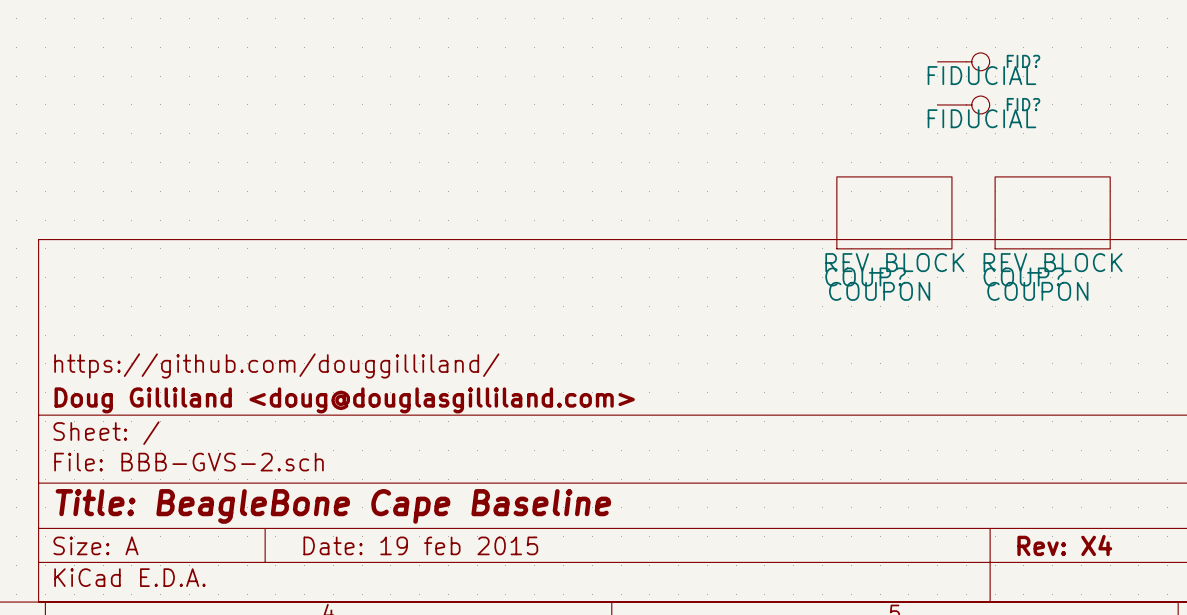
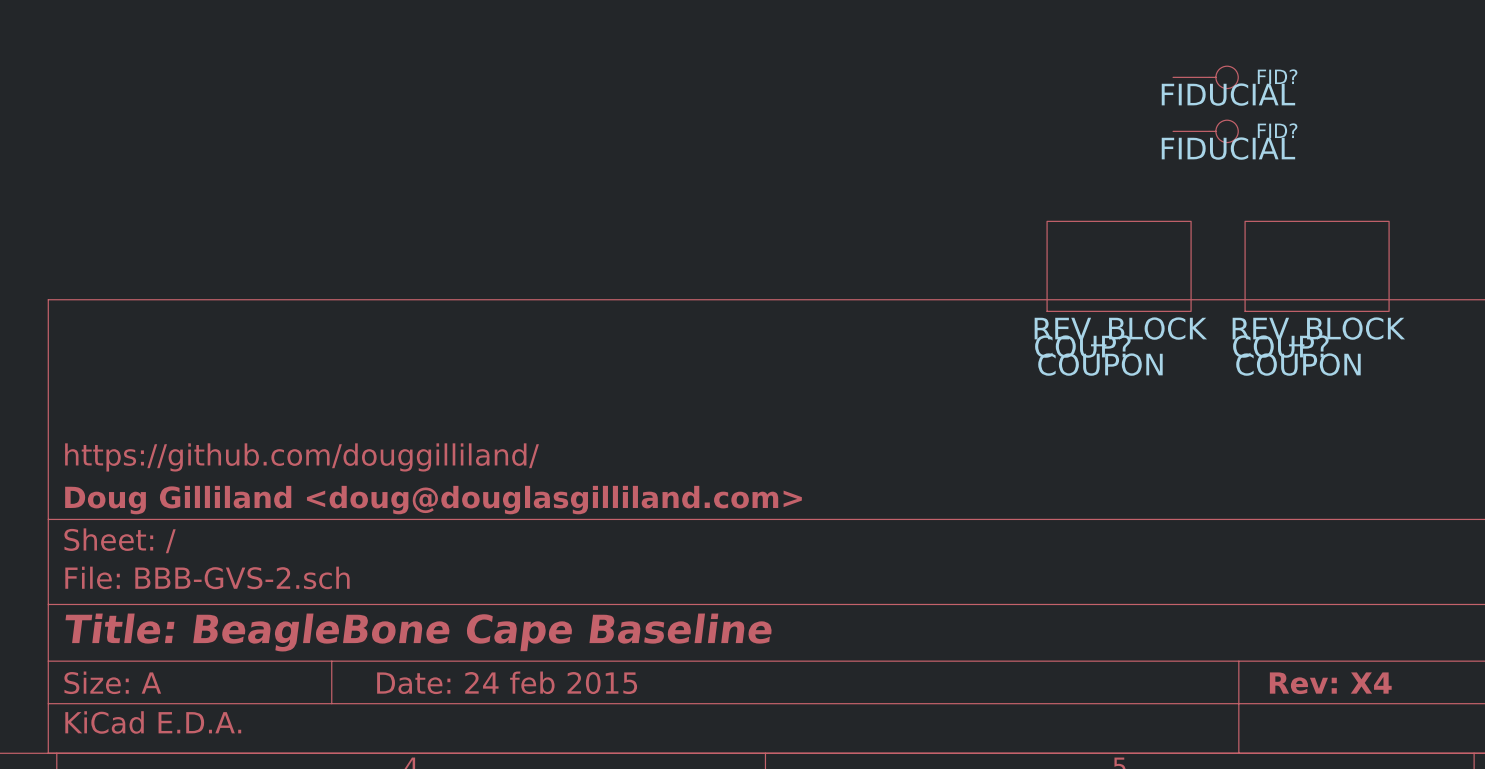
title block: Date: 19 feb 2015 (420, 545) -> Date: 24 feb 2015 (507, 682)

